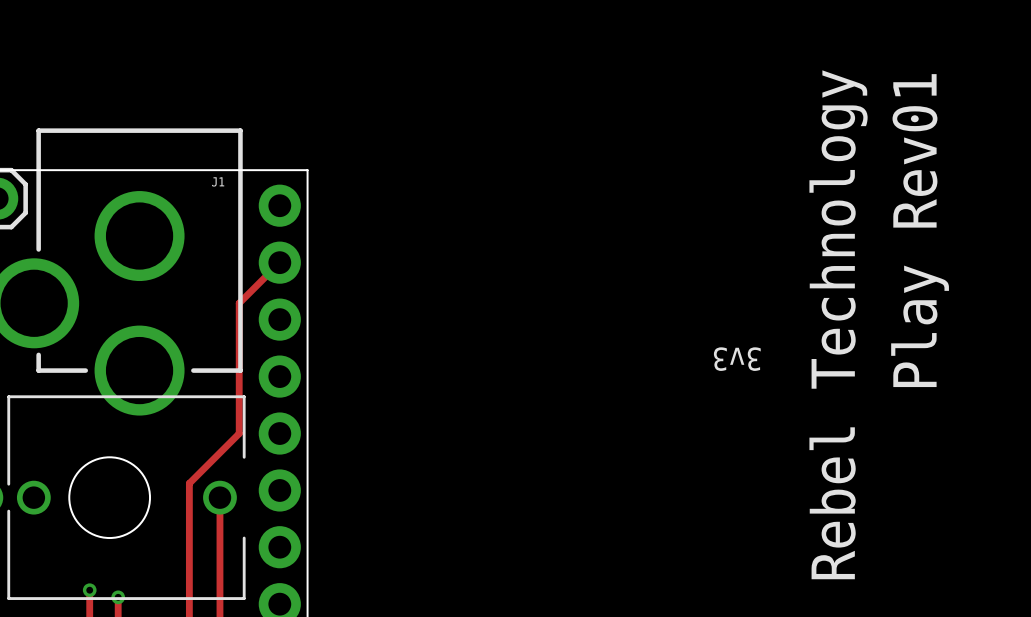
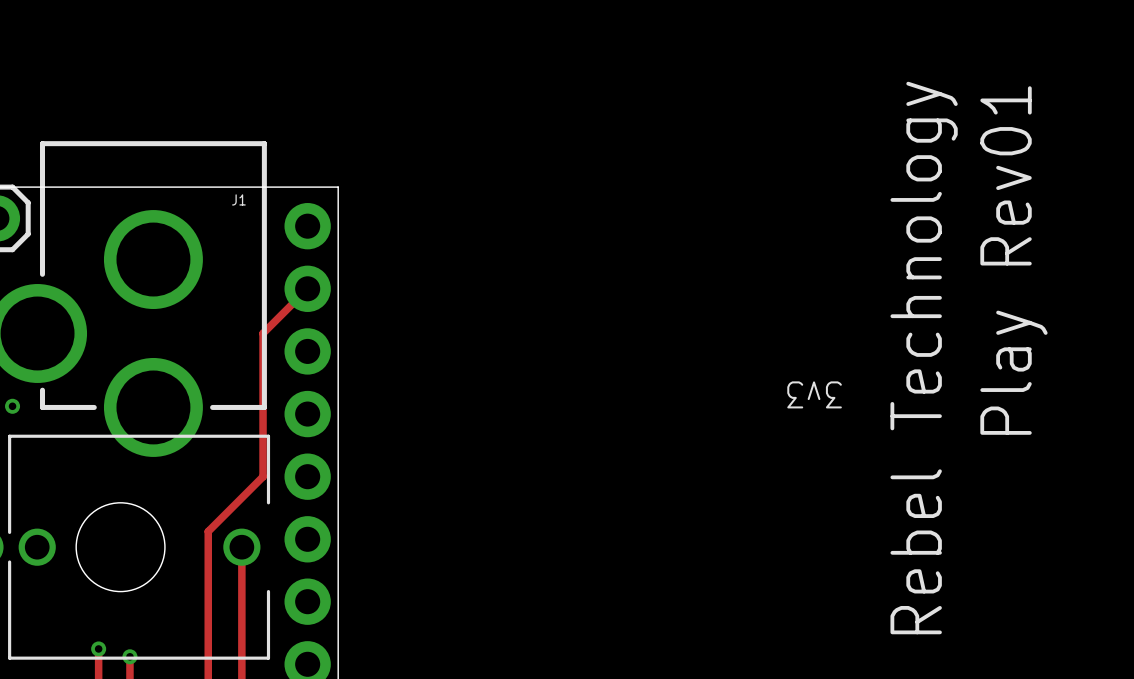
via: none -> (12, 406)

